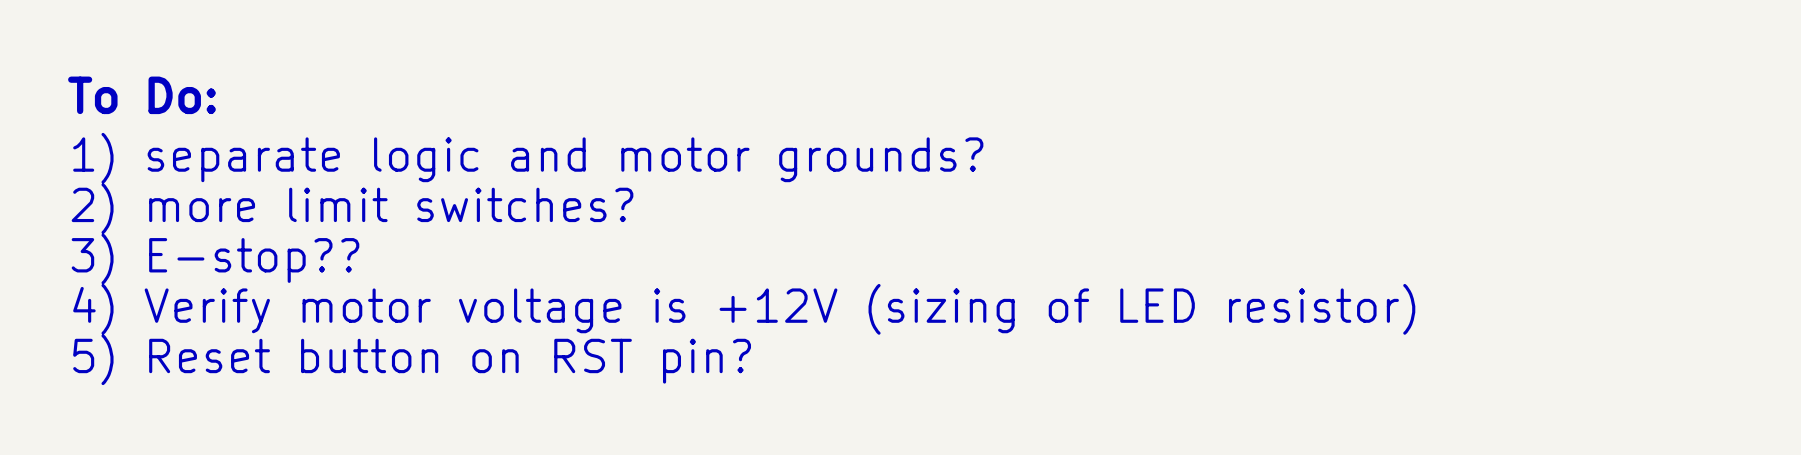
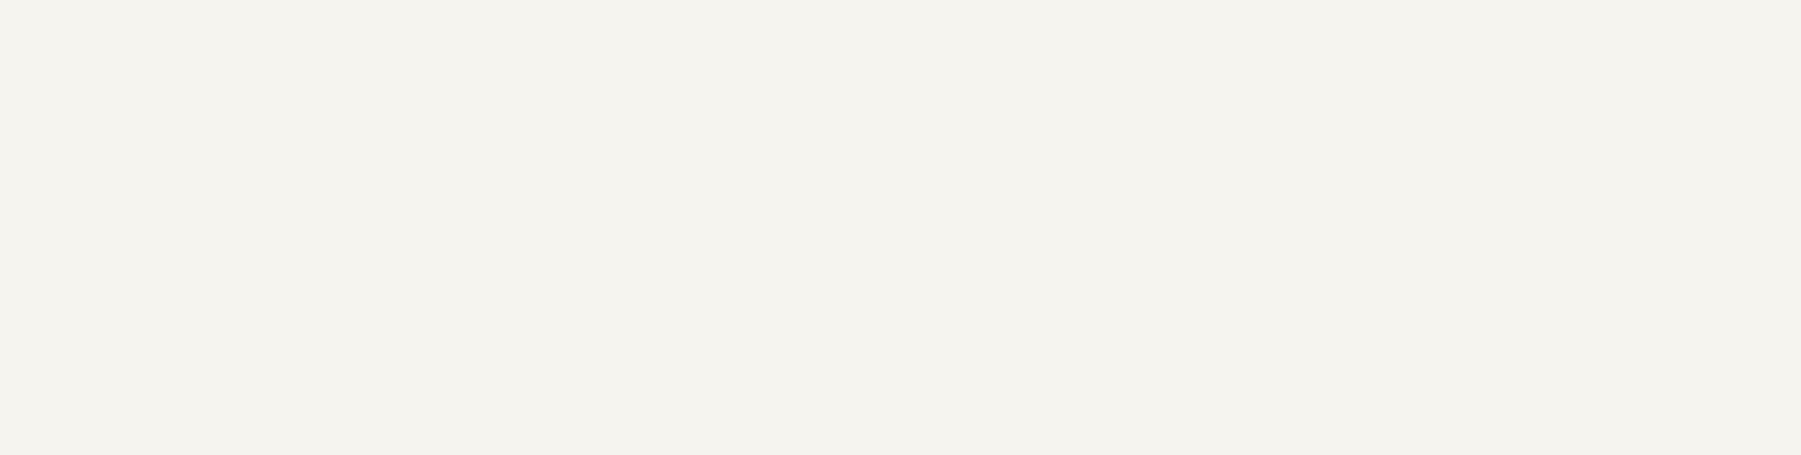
text: To Do: (141, 95) -> none
text: 1) separate logic and motor grounds? (528, 158) -> none
text: 2) more limit switches? (352, 208) -> none
text: 3) E-stop?? (215, 258) -> none
text: 4) Verify motor voltage is +12V (sizing of LED resistor) (744, 309) -> none
text: 5) Reset button on RST pin? (412, 359) -> none

